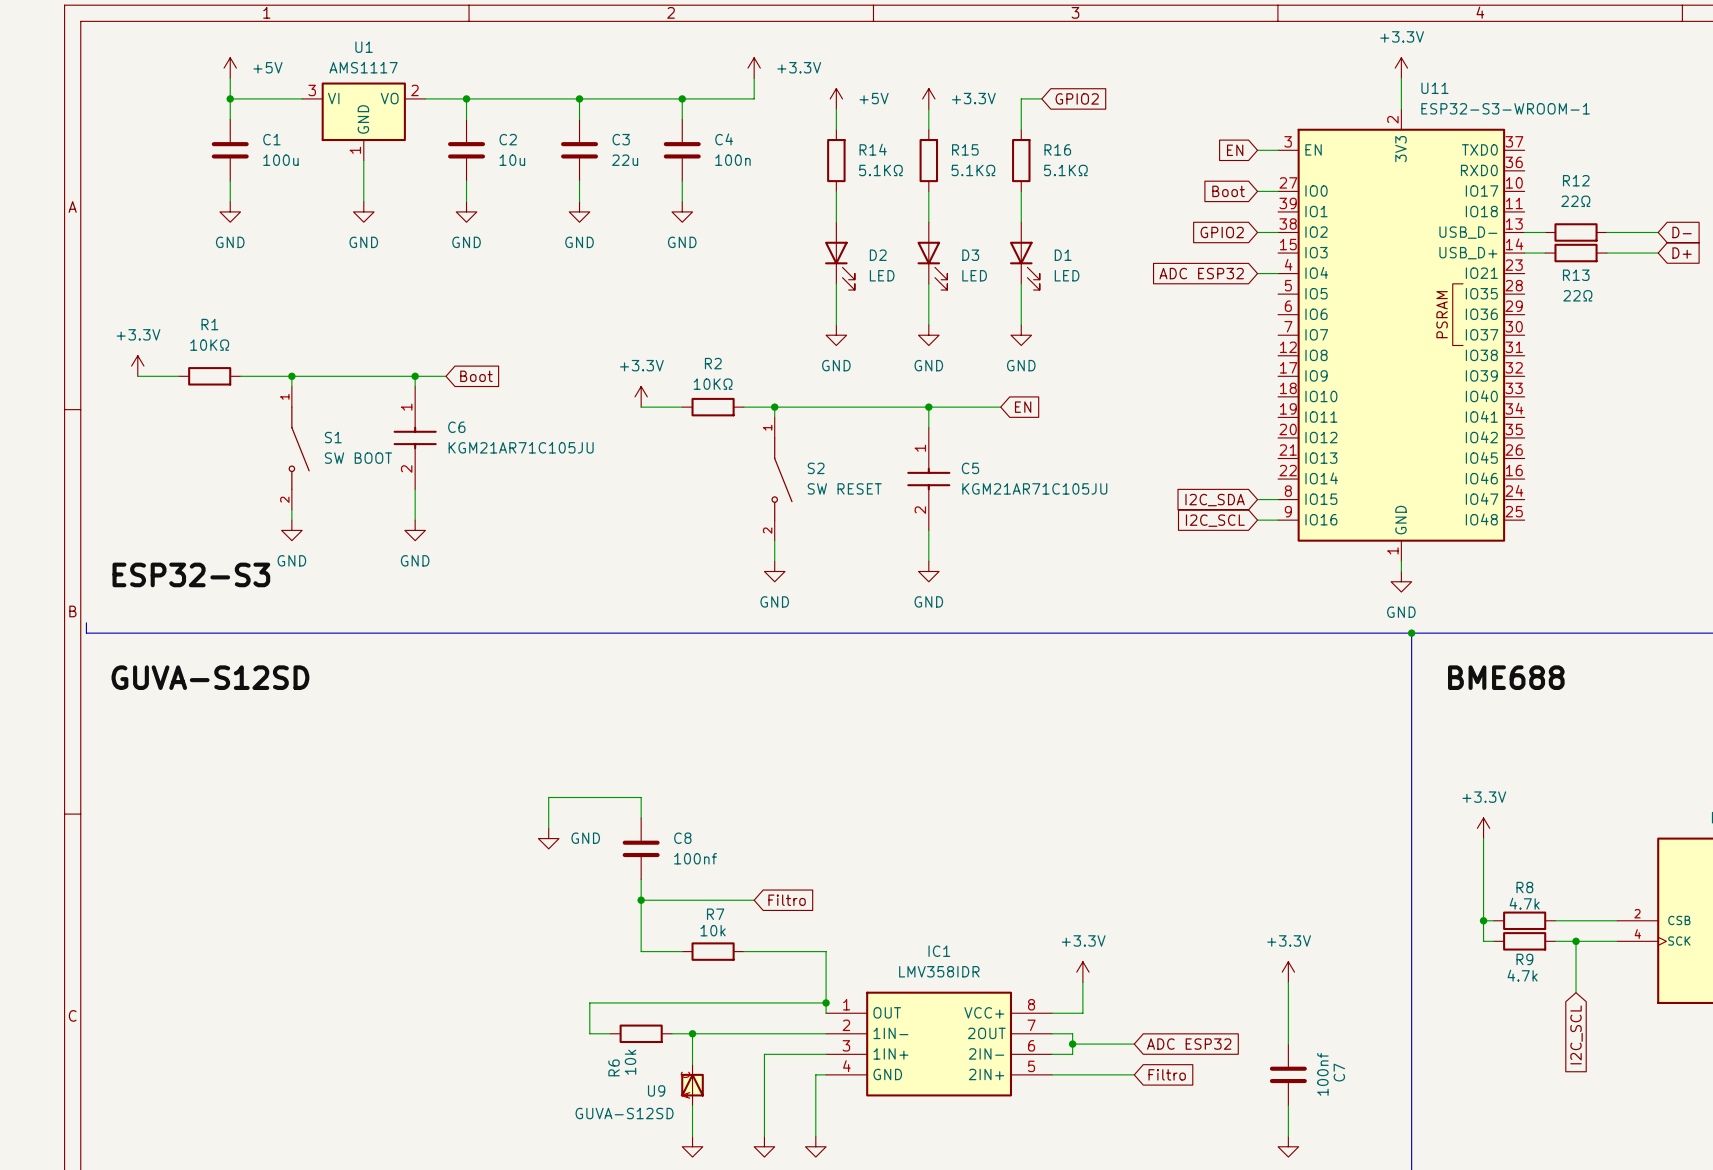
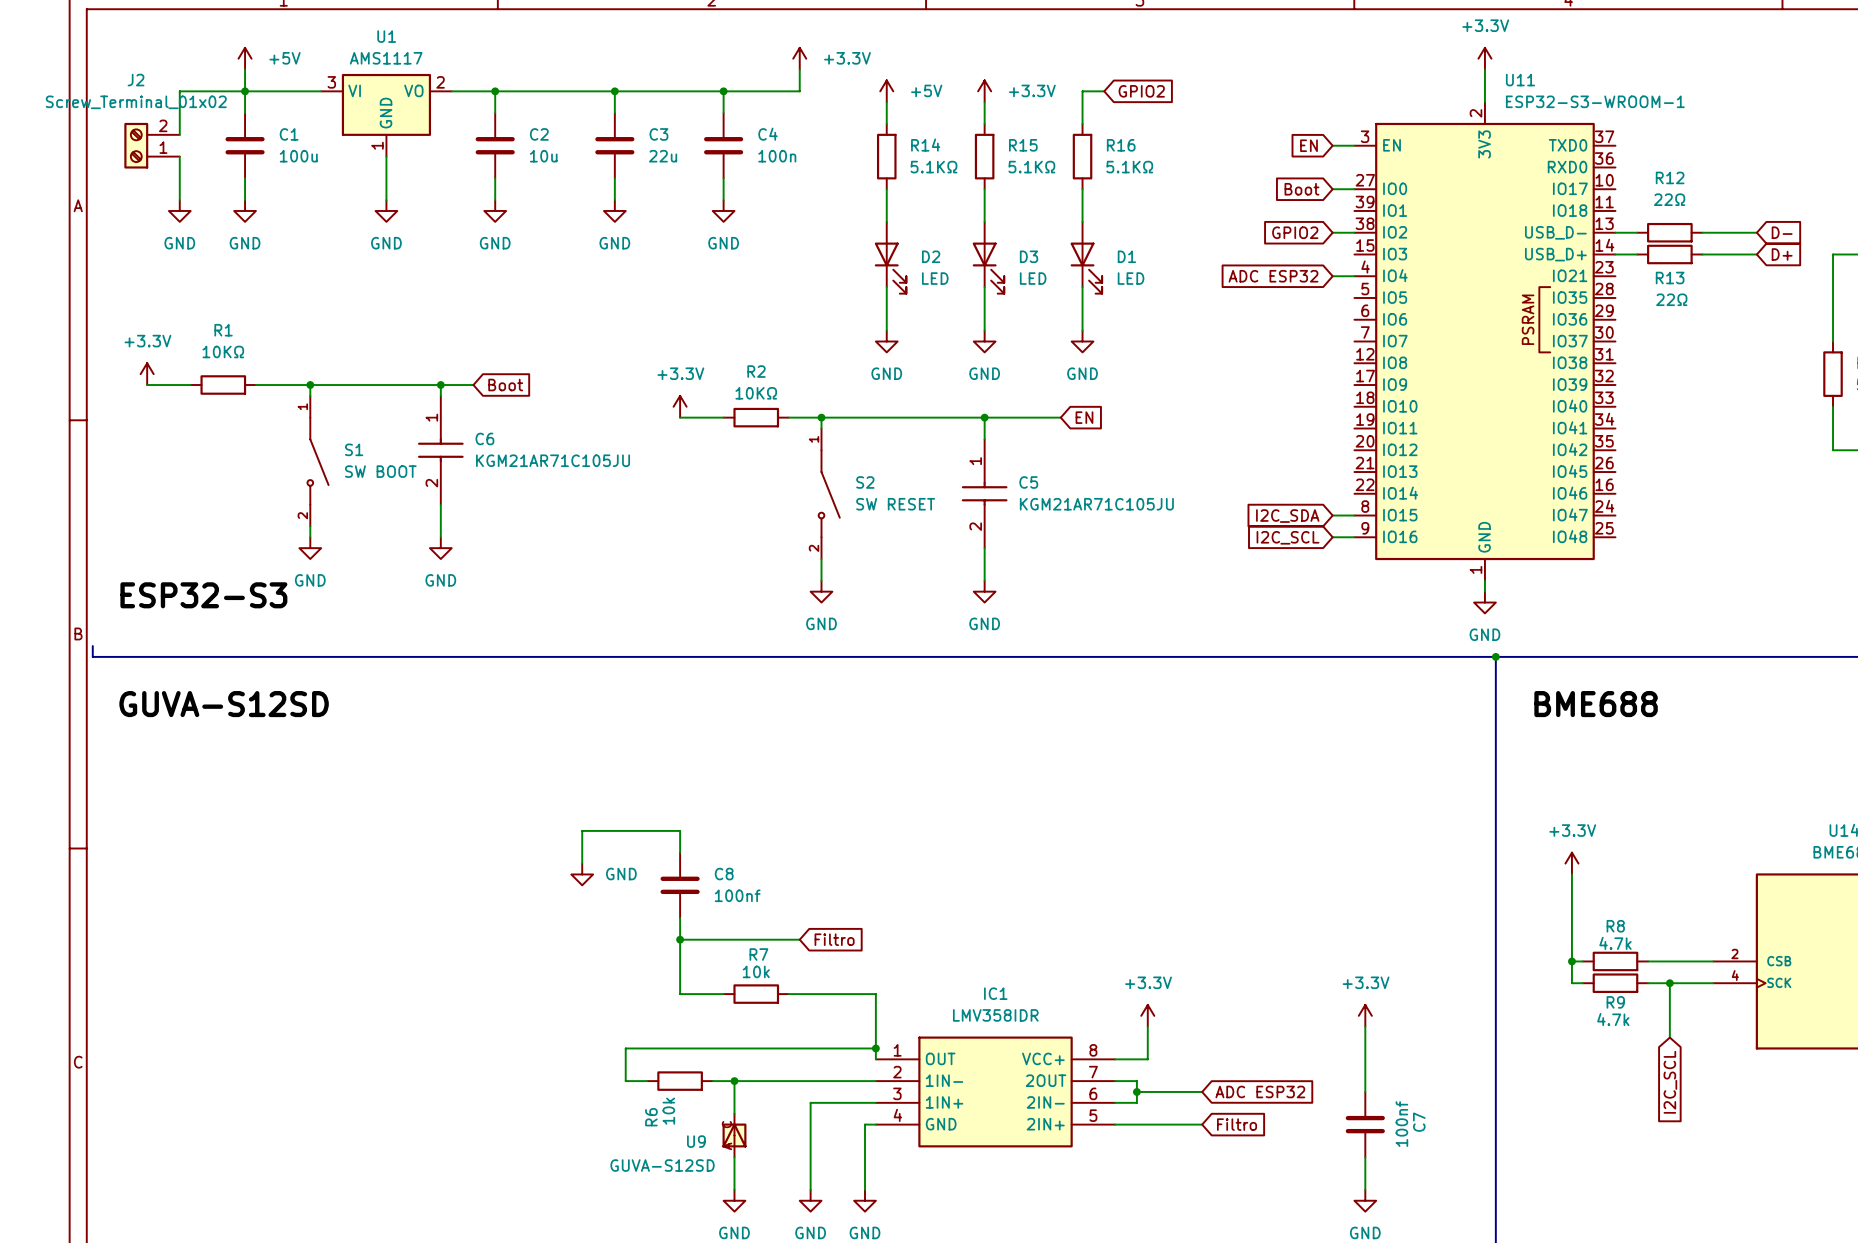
wire: none -> (245, 91) (179, 91) (179, 134)
J2: none -> Screw_Terminal_01x02 (152, 145)
wire: none -> (179, 156) (179, 200)
power symbol: none -> GND (179, 210)

